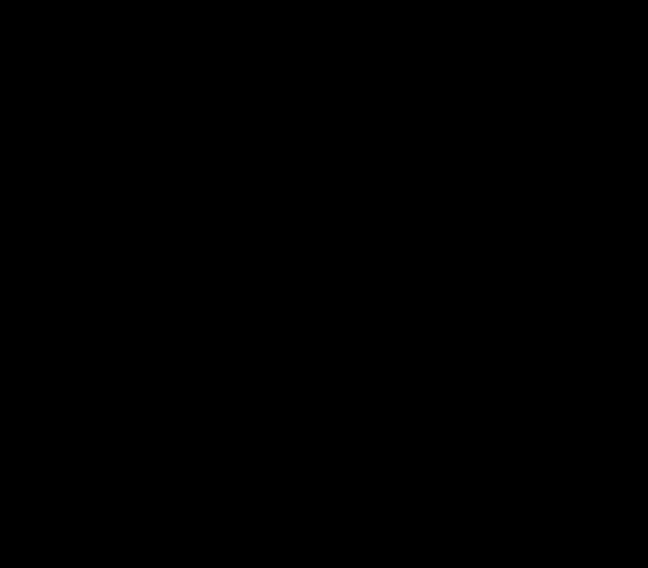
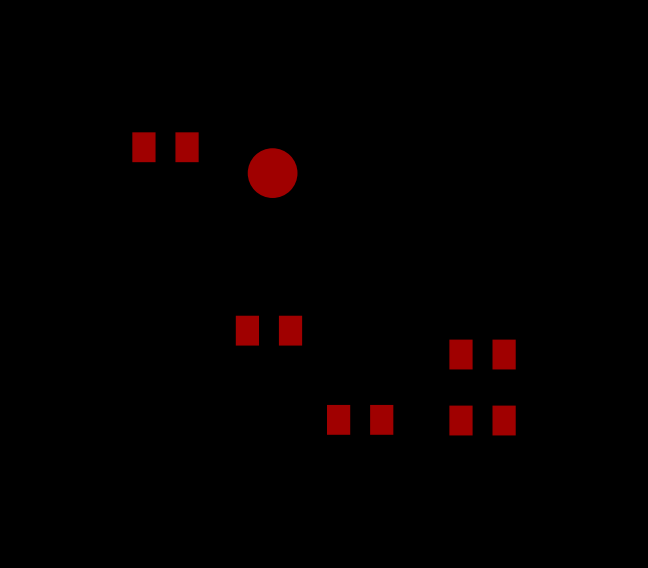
part: none -> (165, 147)
part: none -> (272, 173)
part: none -> (268, 330)
part: none -> (482, 354)
part: none -> (360, 419)
part: none -> (482, 420)

